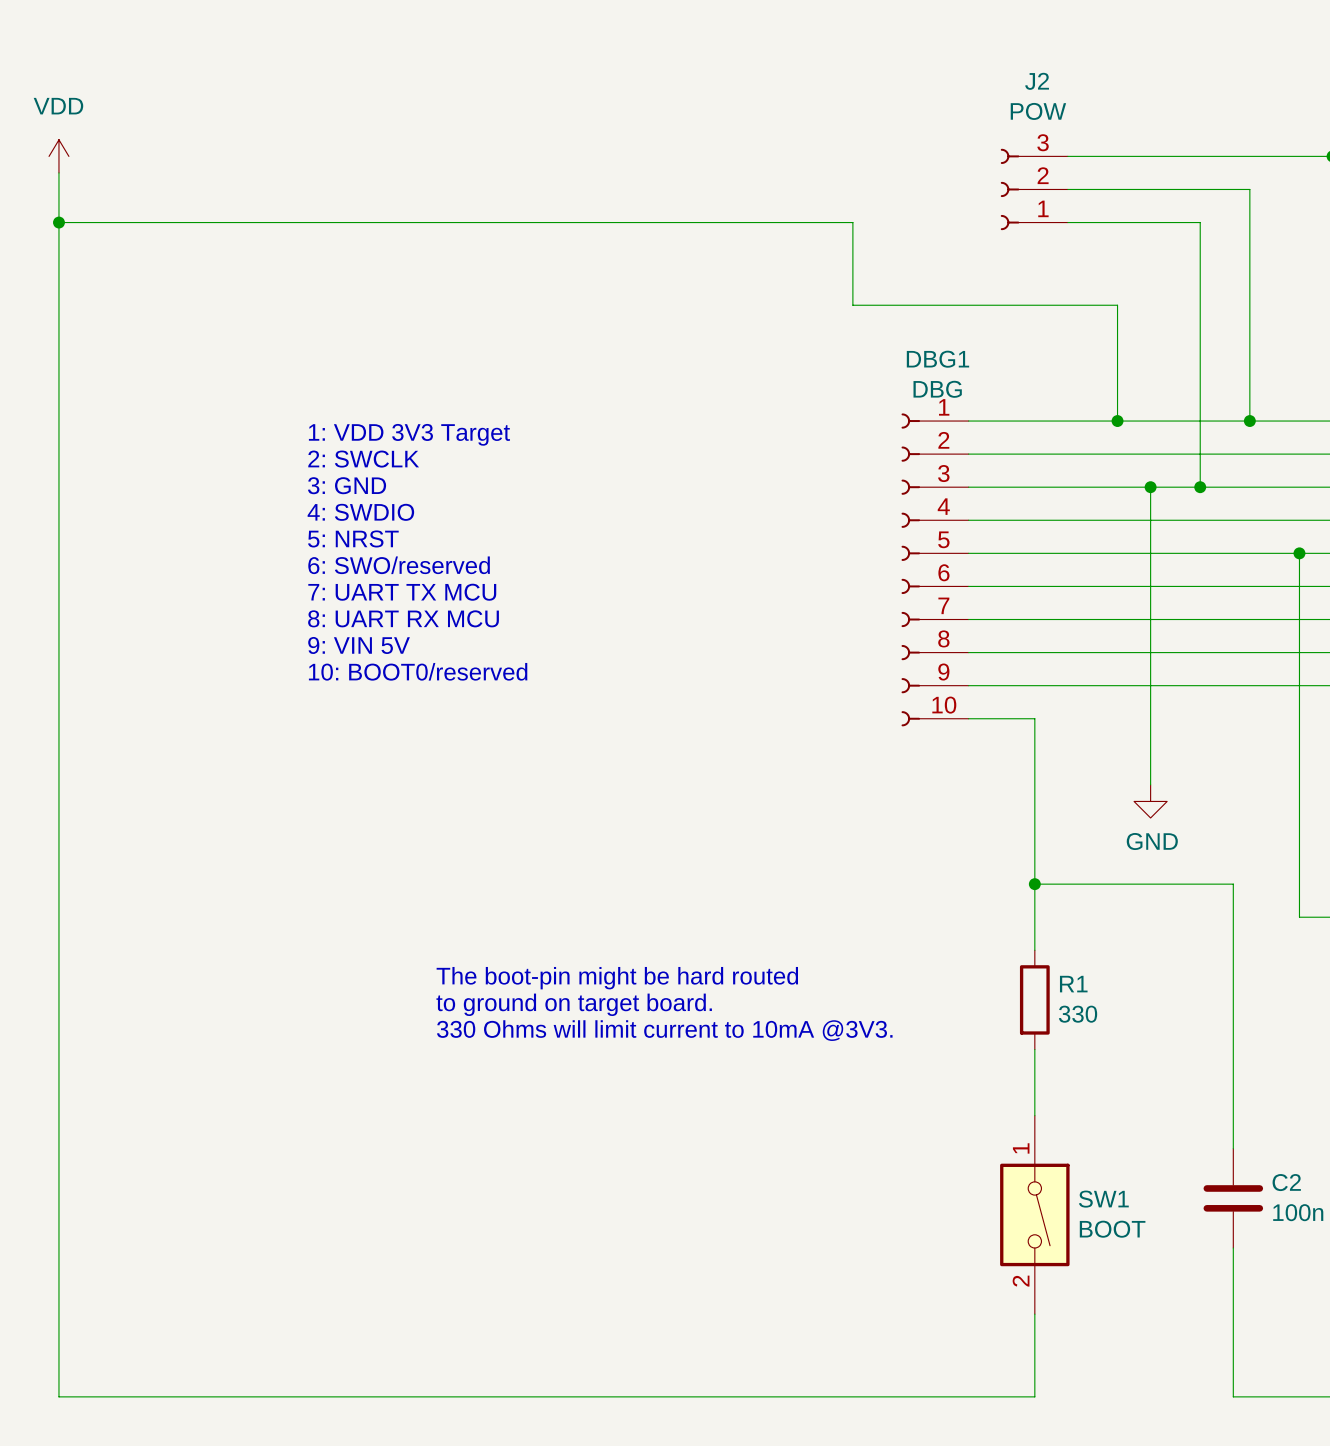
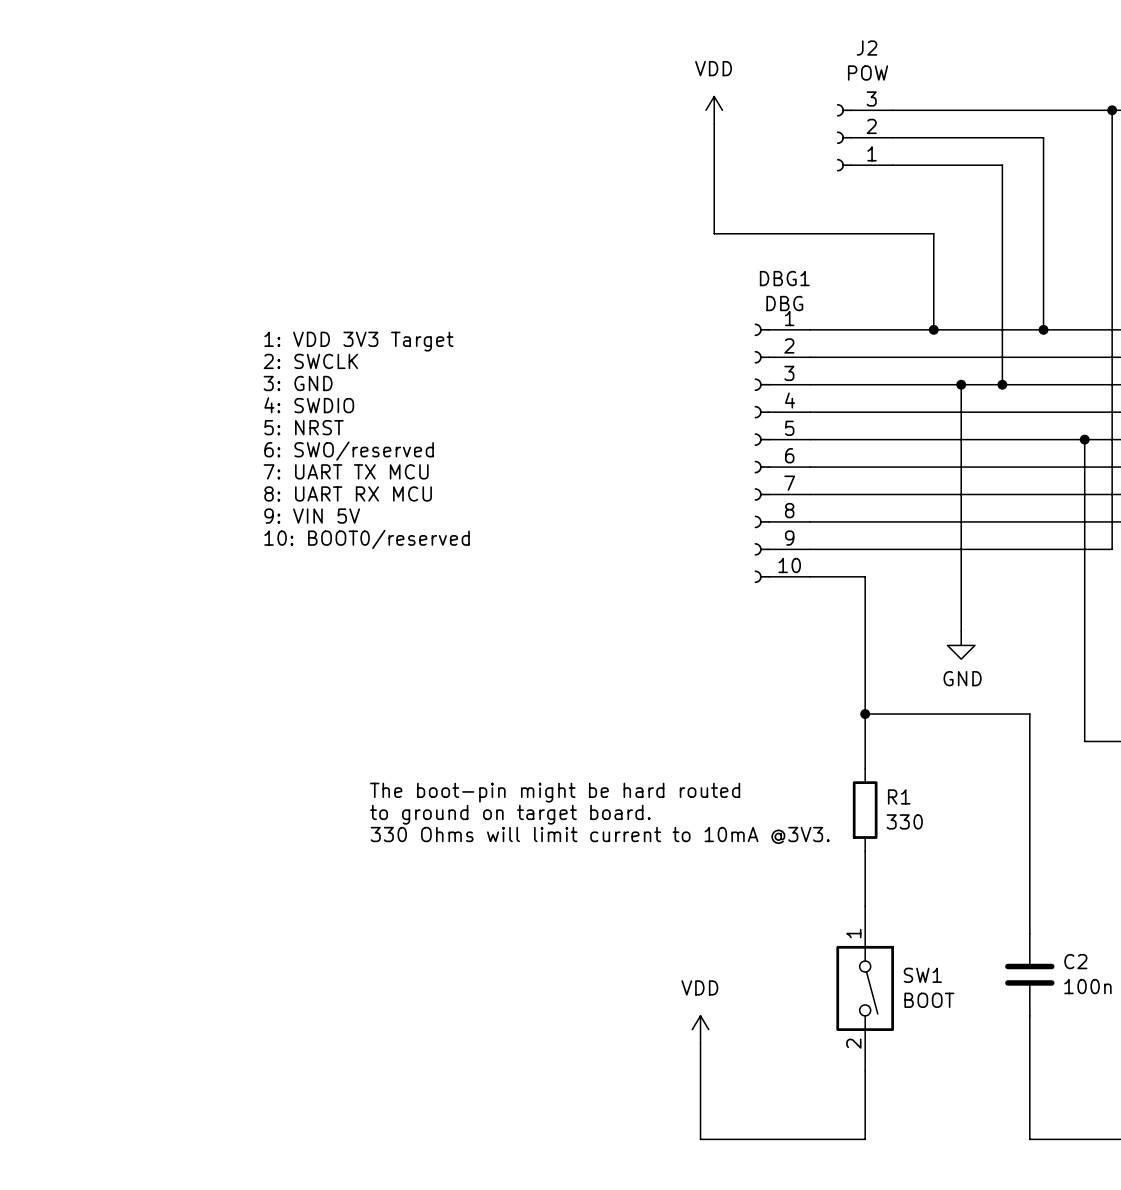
power symbol: VDD (58, 156) -> none
power symbol: none -> VDD (714, 110)
wire: (58, 172) (58, 1396) (836, 1396) -> (700, 1043) (700, 1139)
wire: (58, 222) (852, 222) -> (714, 124) (714, 165)
junction: (58, 222) -> none
power symbol: none -> VDD (700, 1029)

